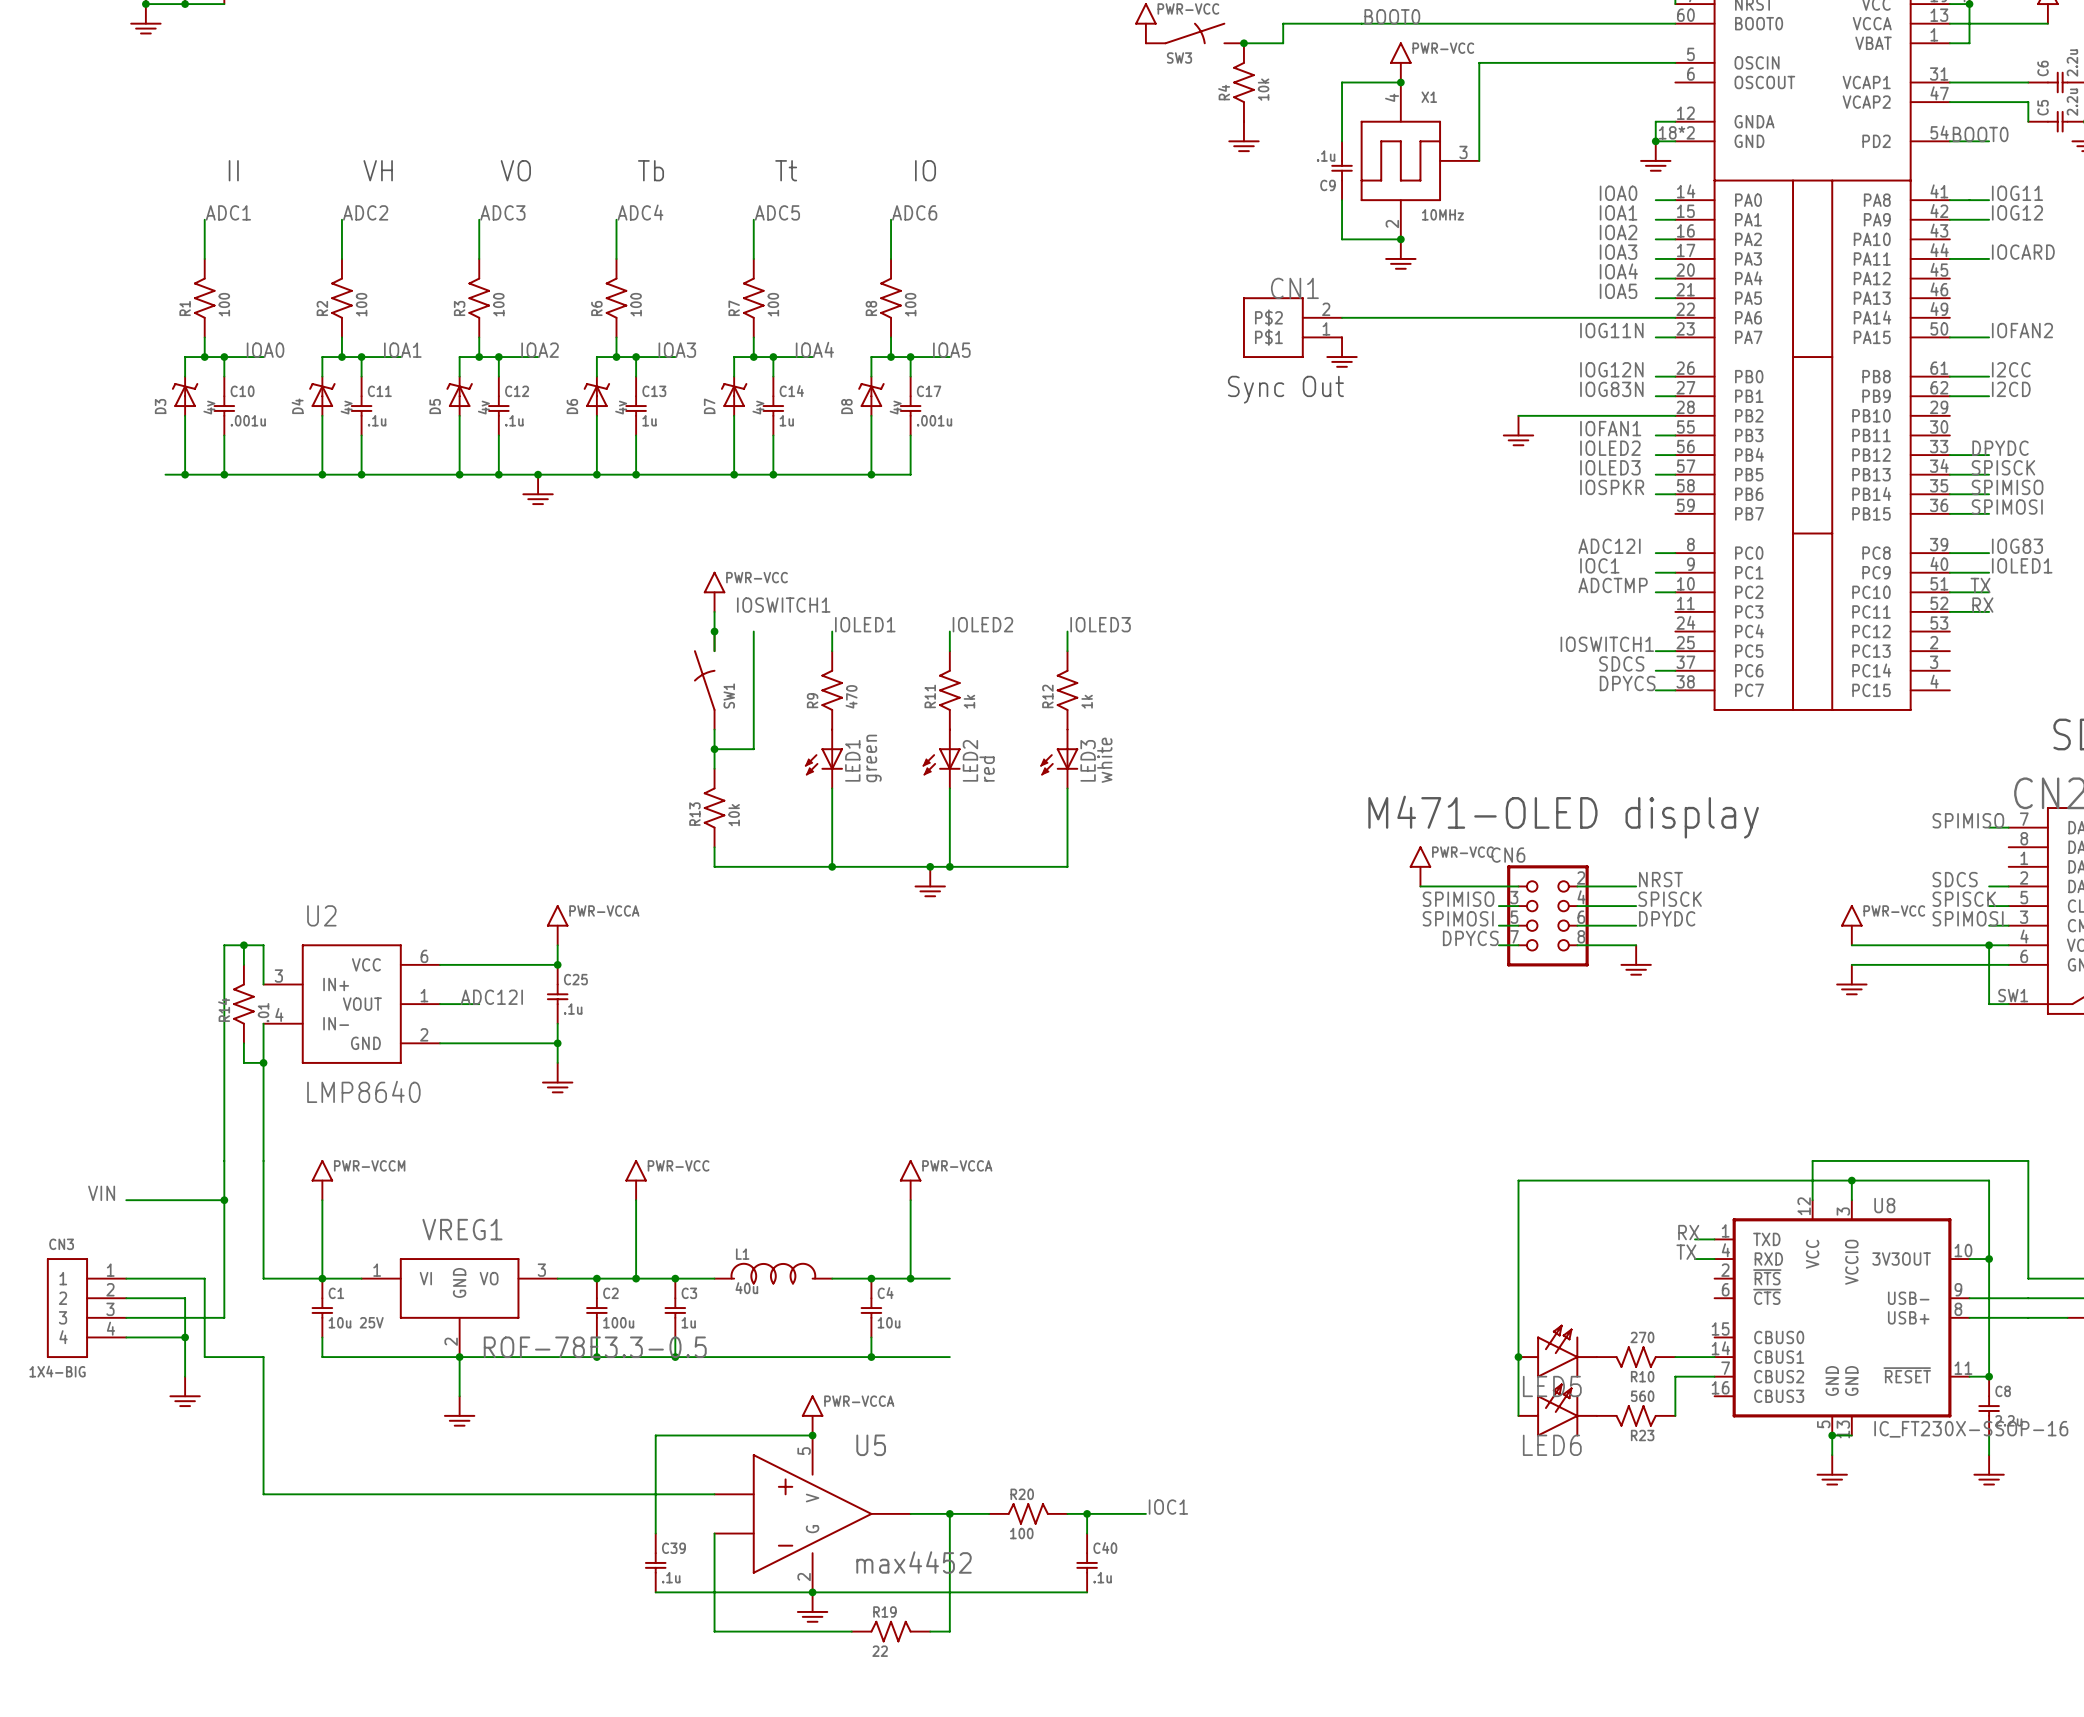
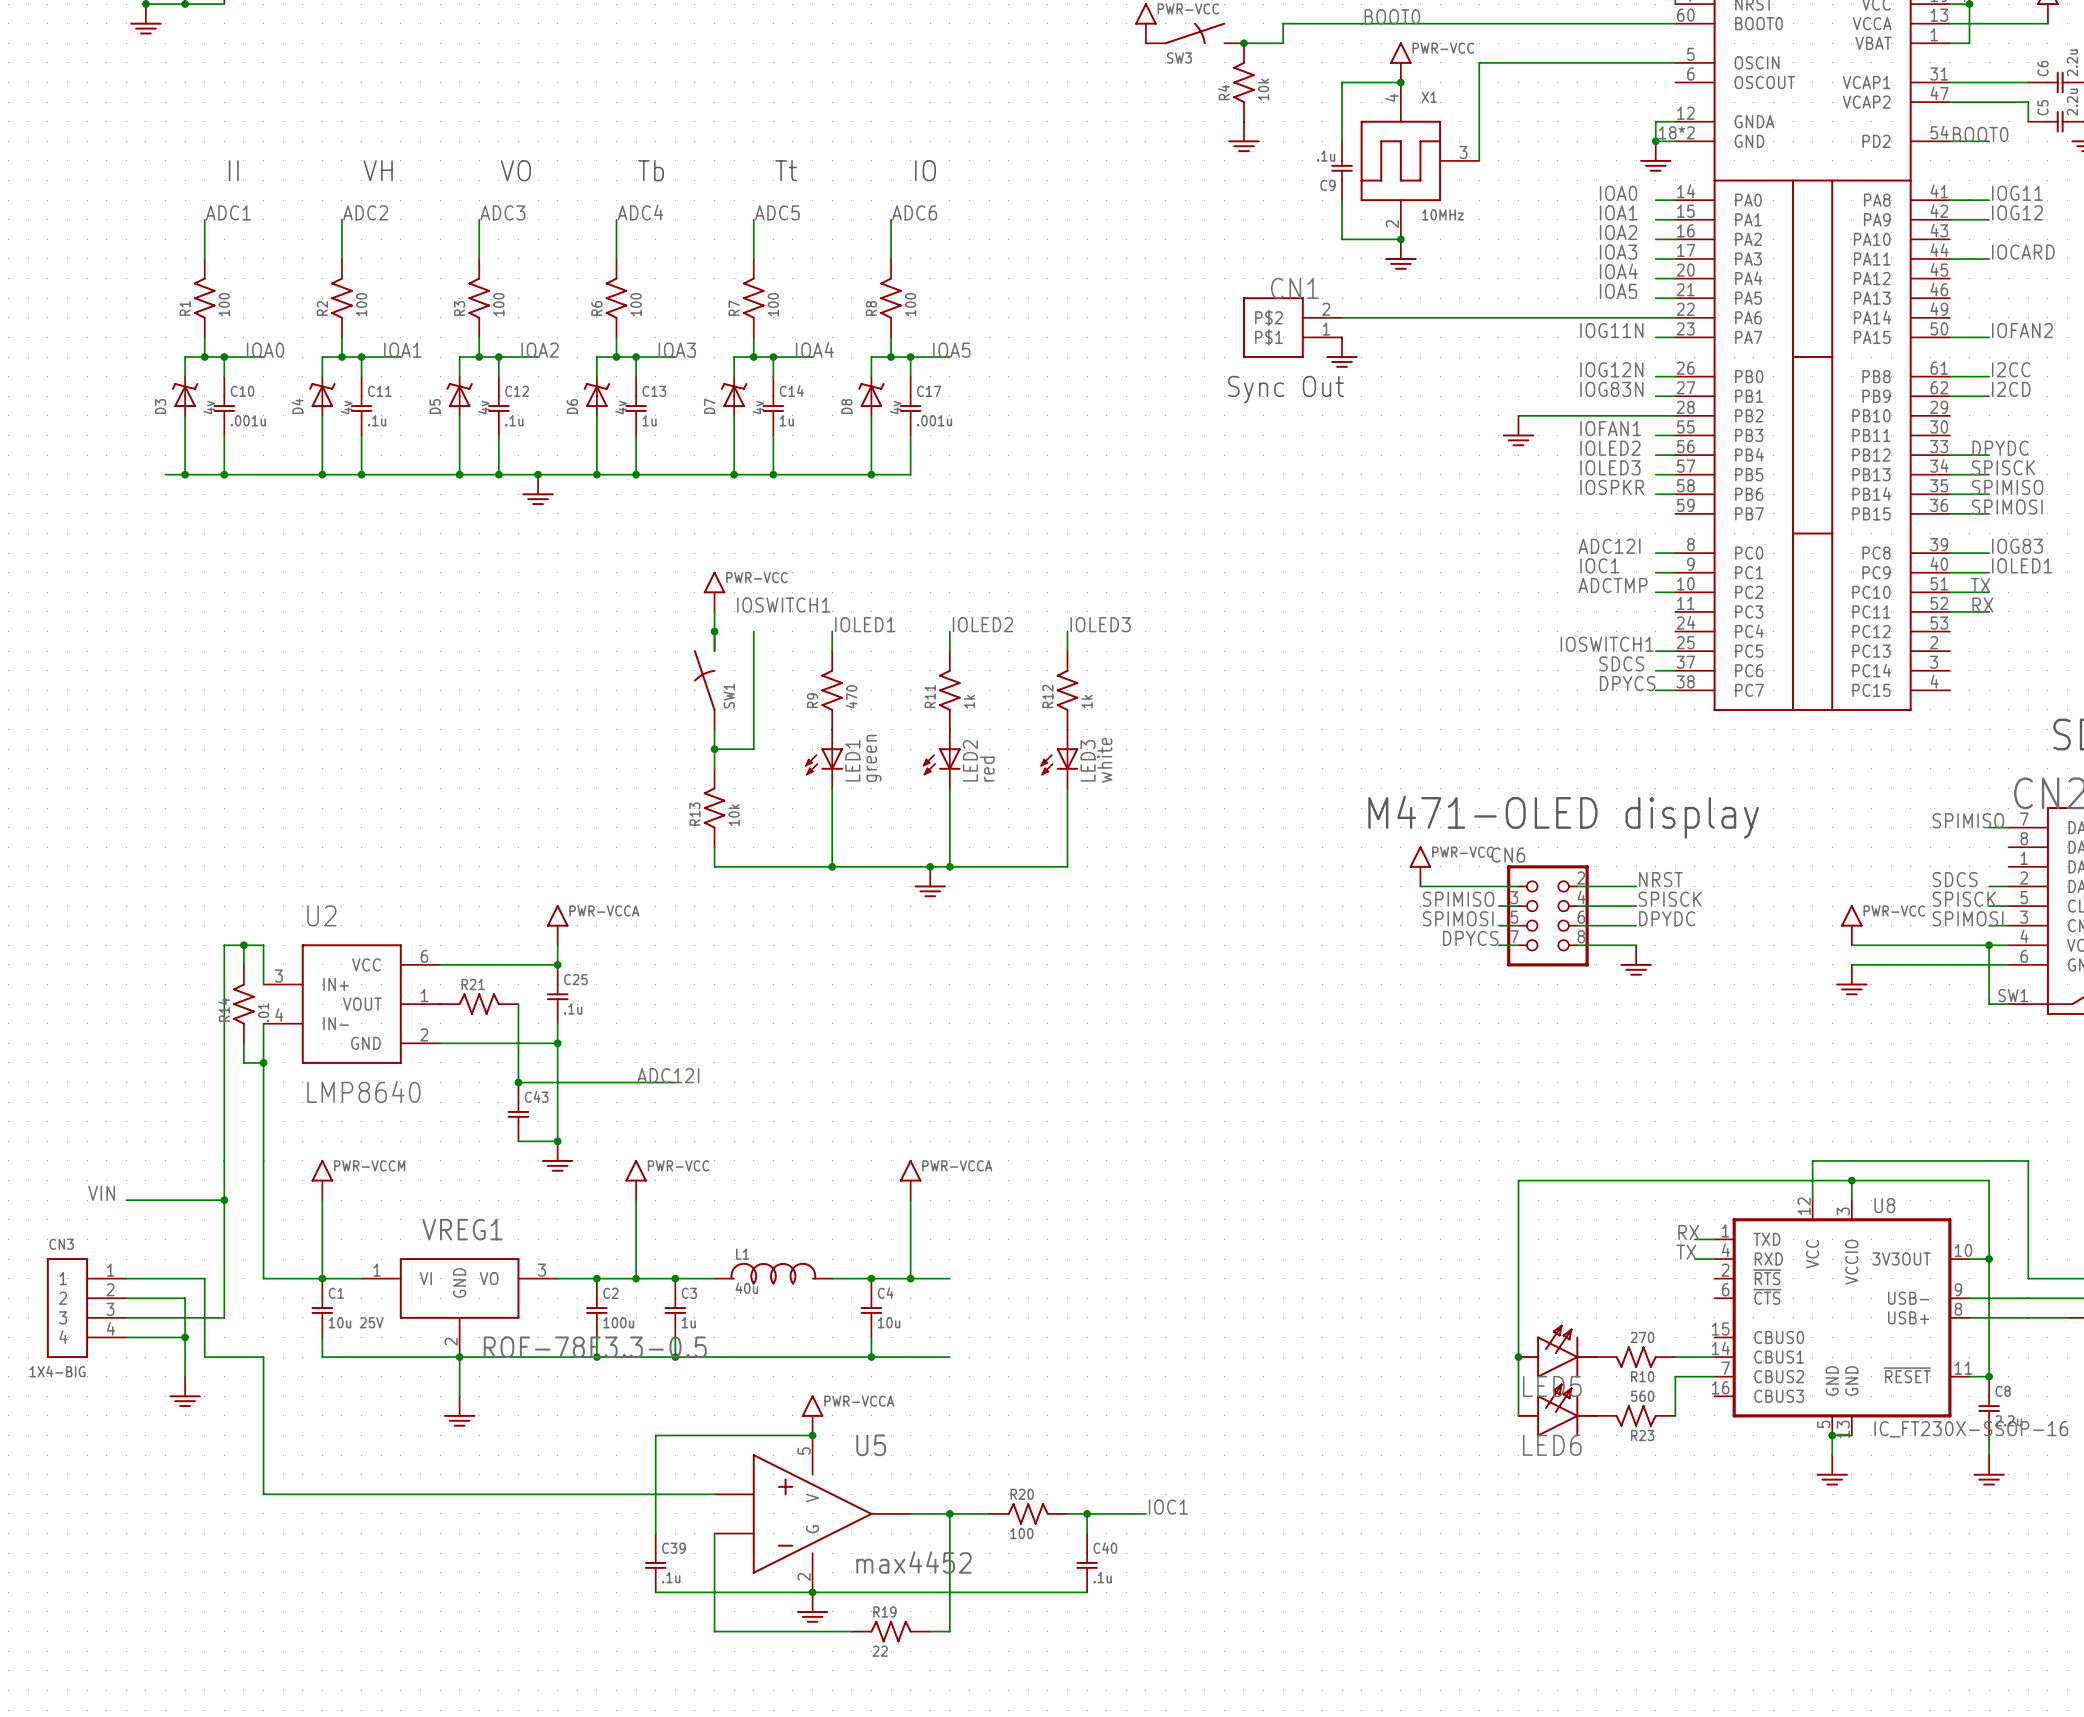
label: ADC12I (491, 997) -> none
R21: none -> (479, 1004)
wire: none -> (518, 1004) (518, 1082) (675, 1082)
wire: none -> (557, 1062) (557, 1141) (518, 1141)
label: none -> ADC12I (668, 1075)
power symbol position: (557, 1078) -> (557, 1156)
junction: none -> (518, 1082)
C43: none -> (518, 1111)
junction: none -> (557, 1141)

